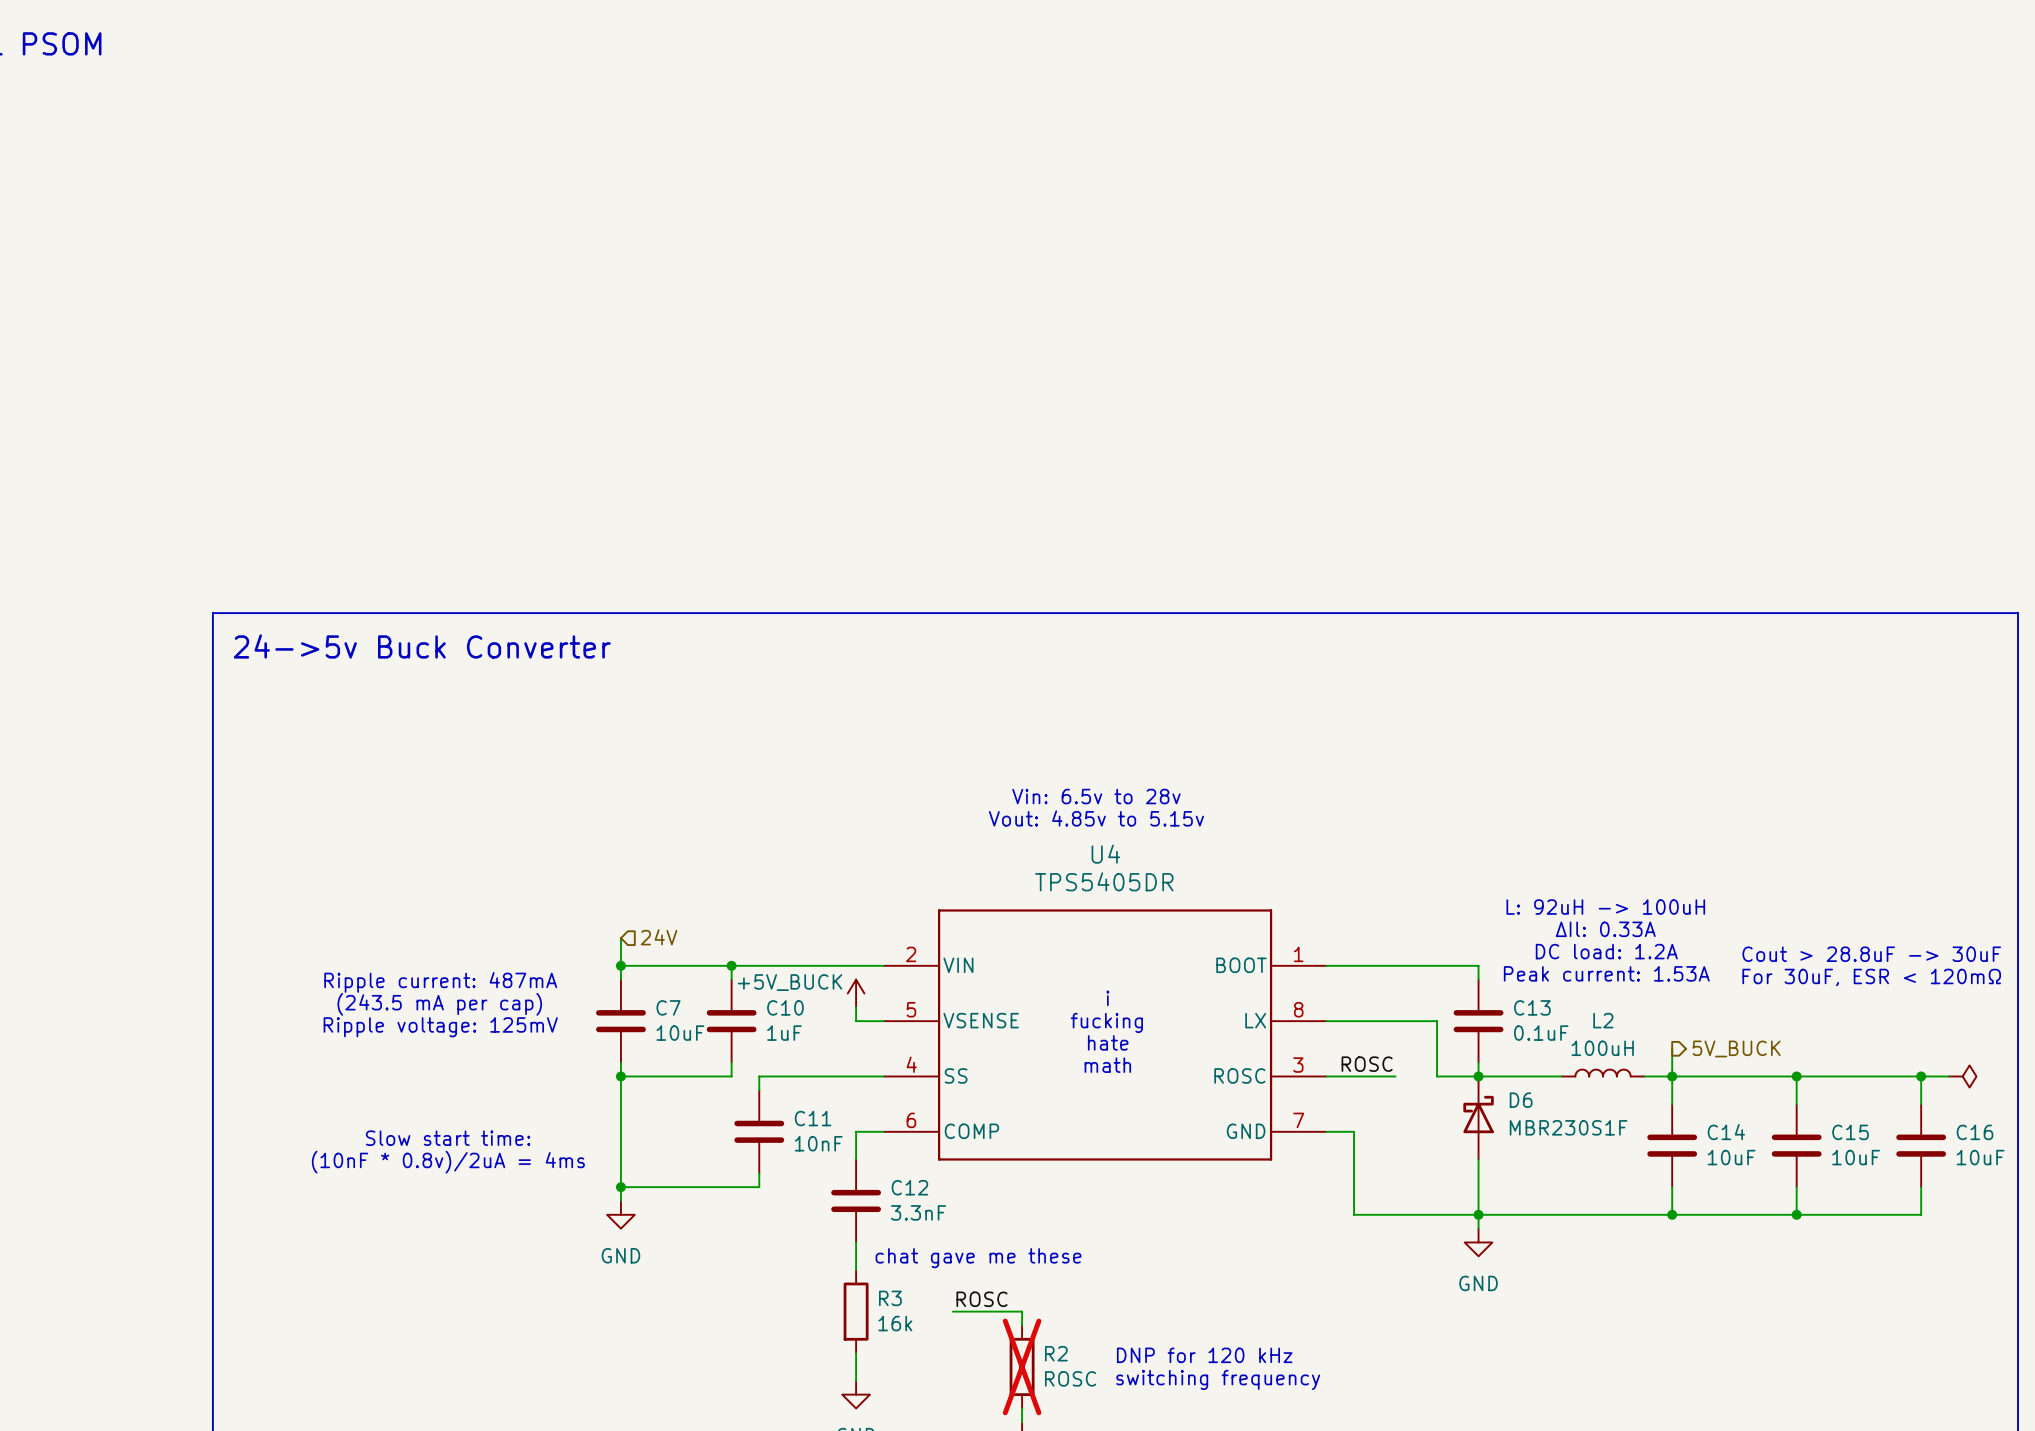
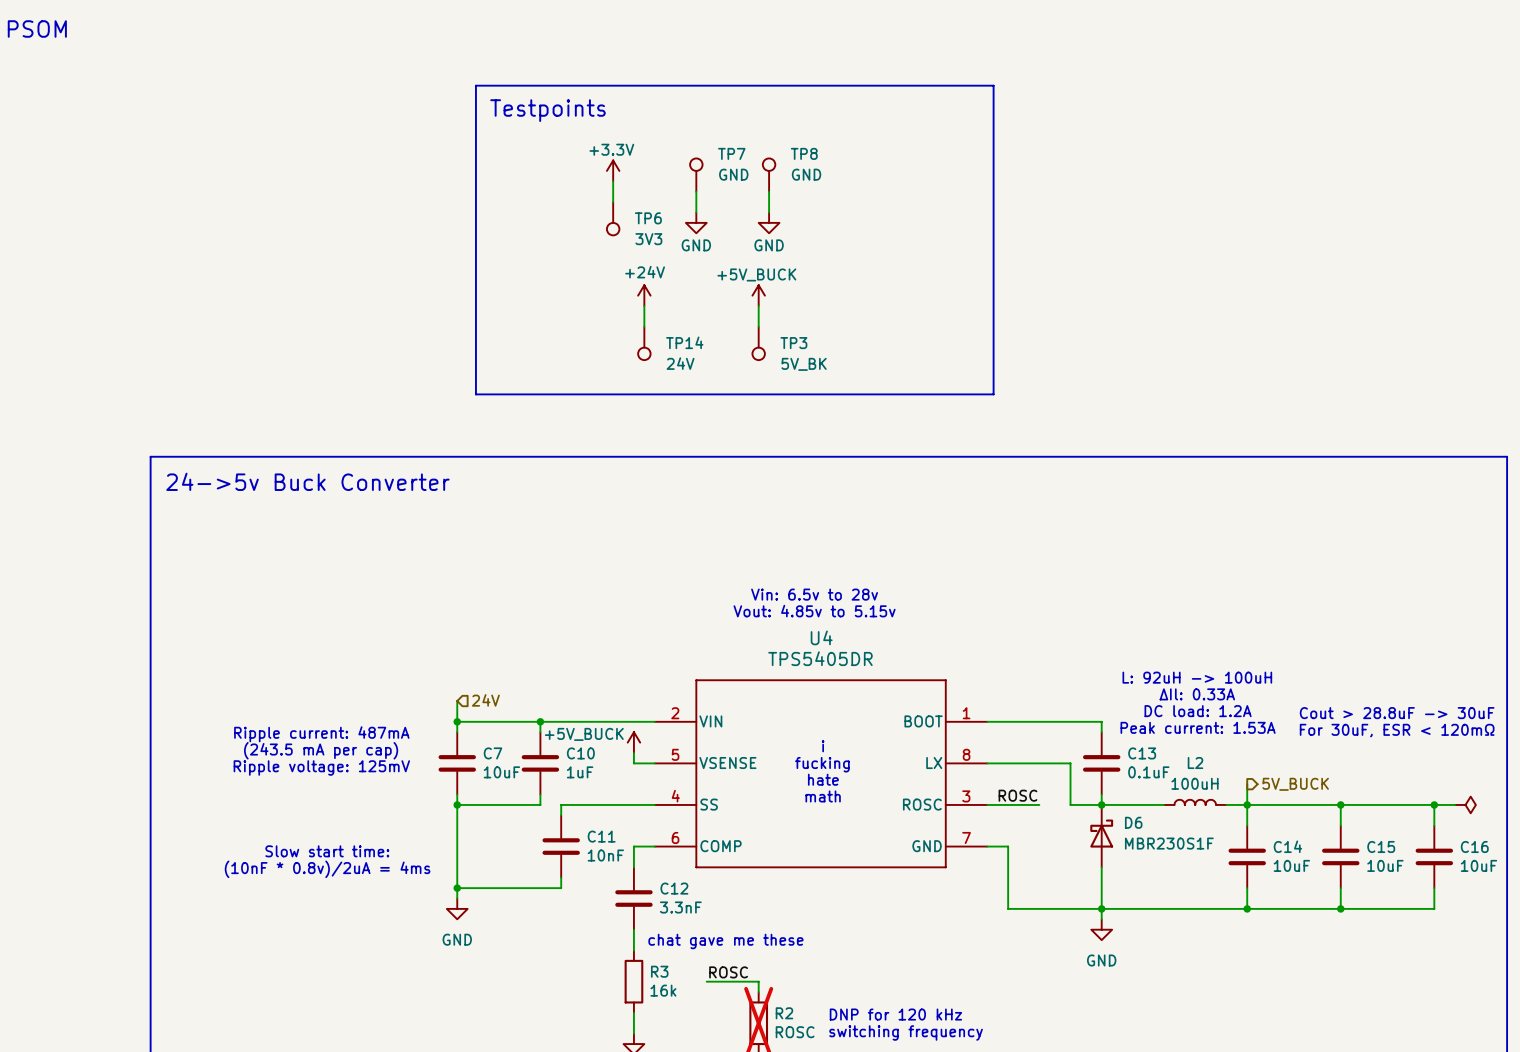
line: none -> (475, 85) (993, 85) (993, 394) (475, 394) (475, 85)
text: none -> Testpoints (547, 110)
power symbol: none -> +3.3V (613, 170)
TP7: none -> GND (696, 175)
TP8: none -> GND (769, 175)
wire: none -> (613, 181) (613, 202)
wire: none -> (696, 191) (696, 212)
wire: none -> (769, 191) (769, 212)
TP6: none -> 3V3 (613, 218)
power symbol: none -> GND (696, 222)
power symbol: none -> GND (769, 222)
power symbol: none -> +24V (644, 295)
power symbol: none -> +5V_BUCK (758, 295)
wire: none -> (644, 306) (644, 326)
wire: none -> (758, 306) (758, 326)
TP14: none -> 24V (644, 343)
TP3: none -> 5V_BK (758, 343)

